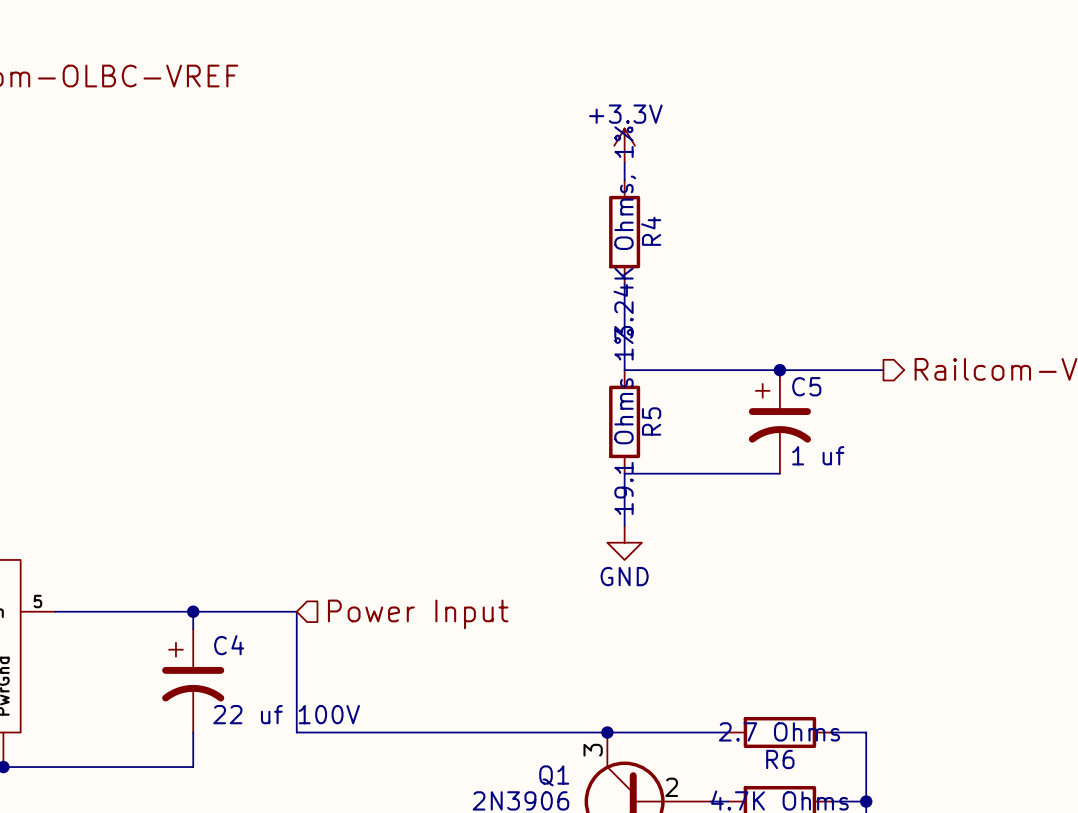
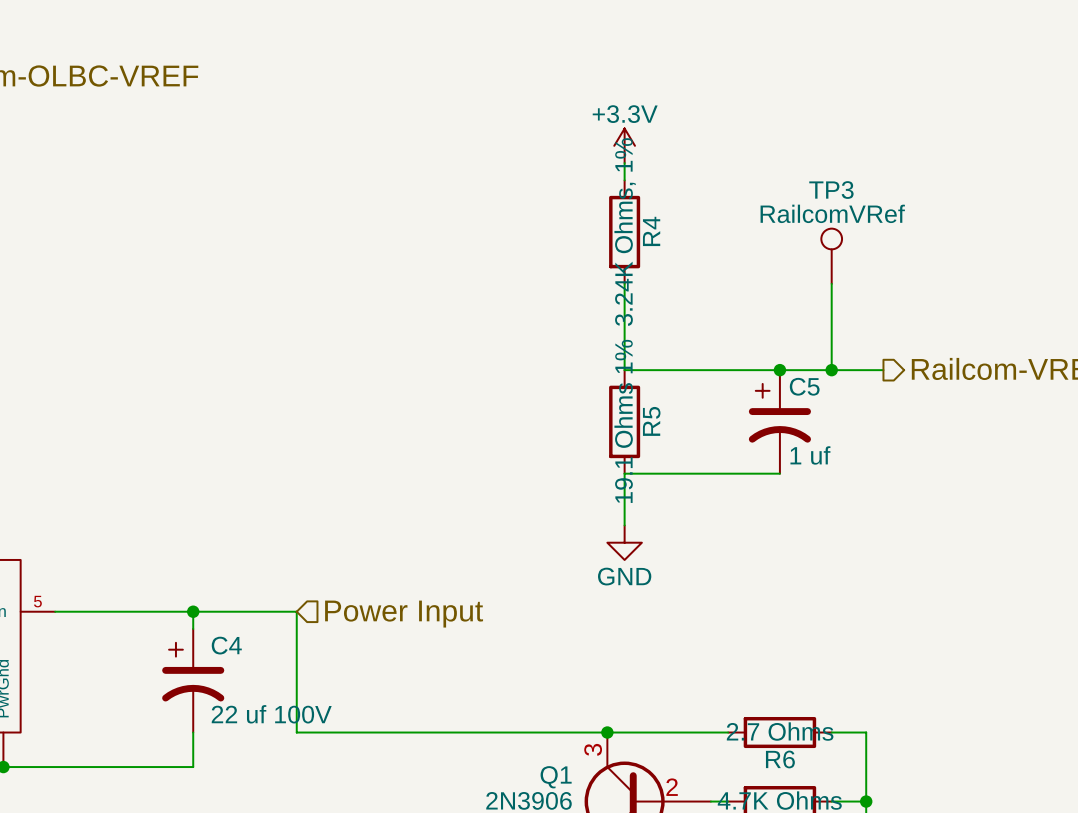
TP3: none -> RailcomVRef (831, 256)
wire: none -> (831, 283) (831, 370)
junction: none -> (831, 370)

